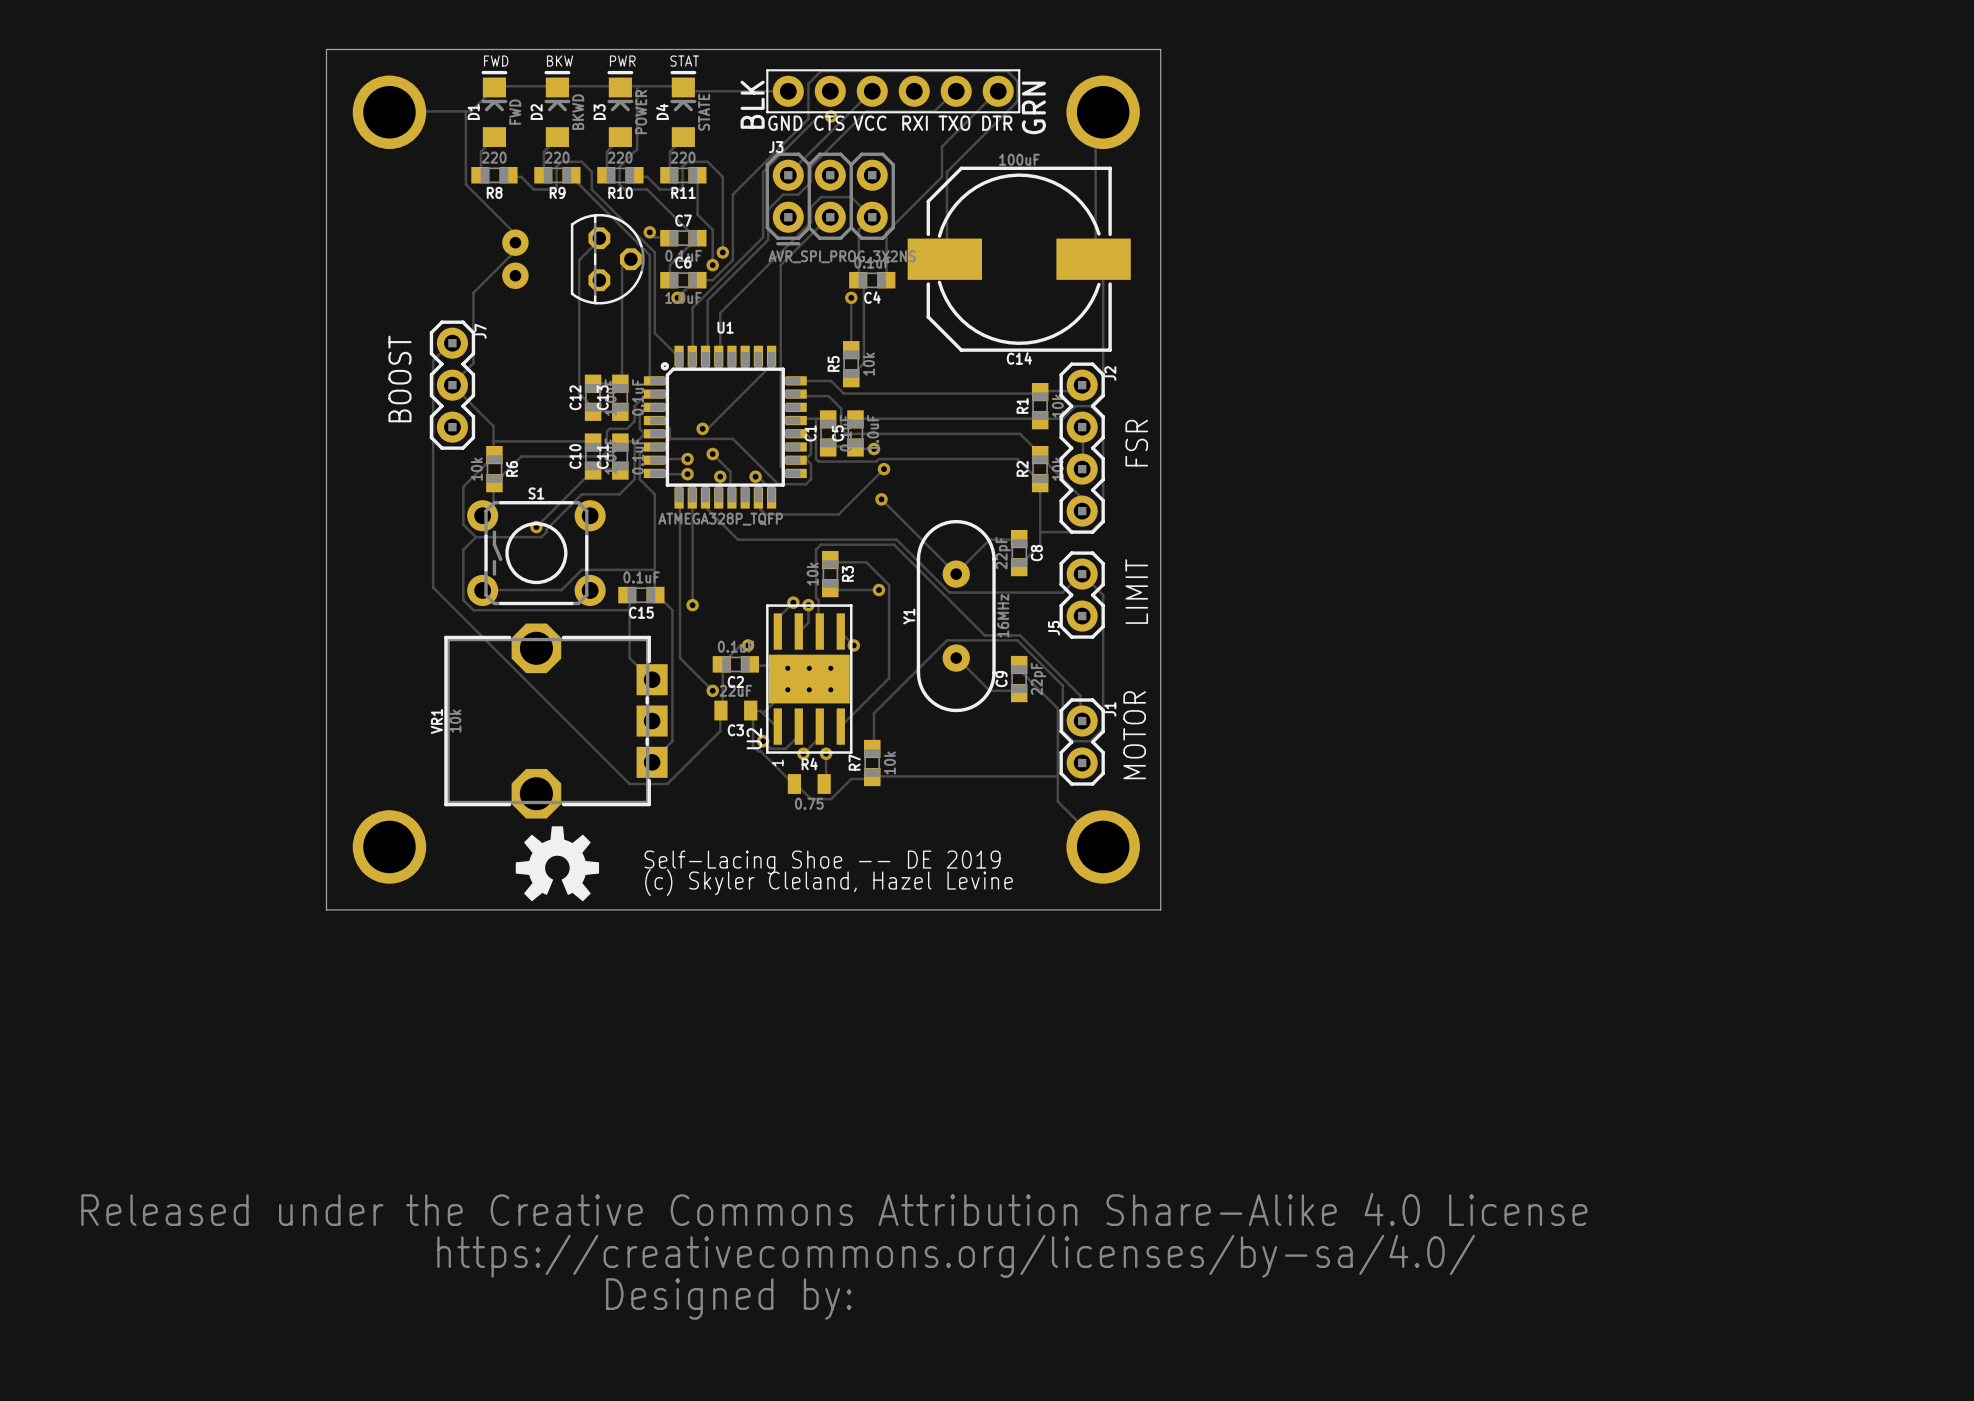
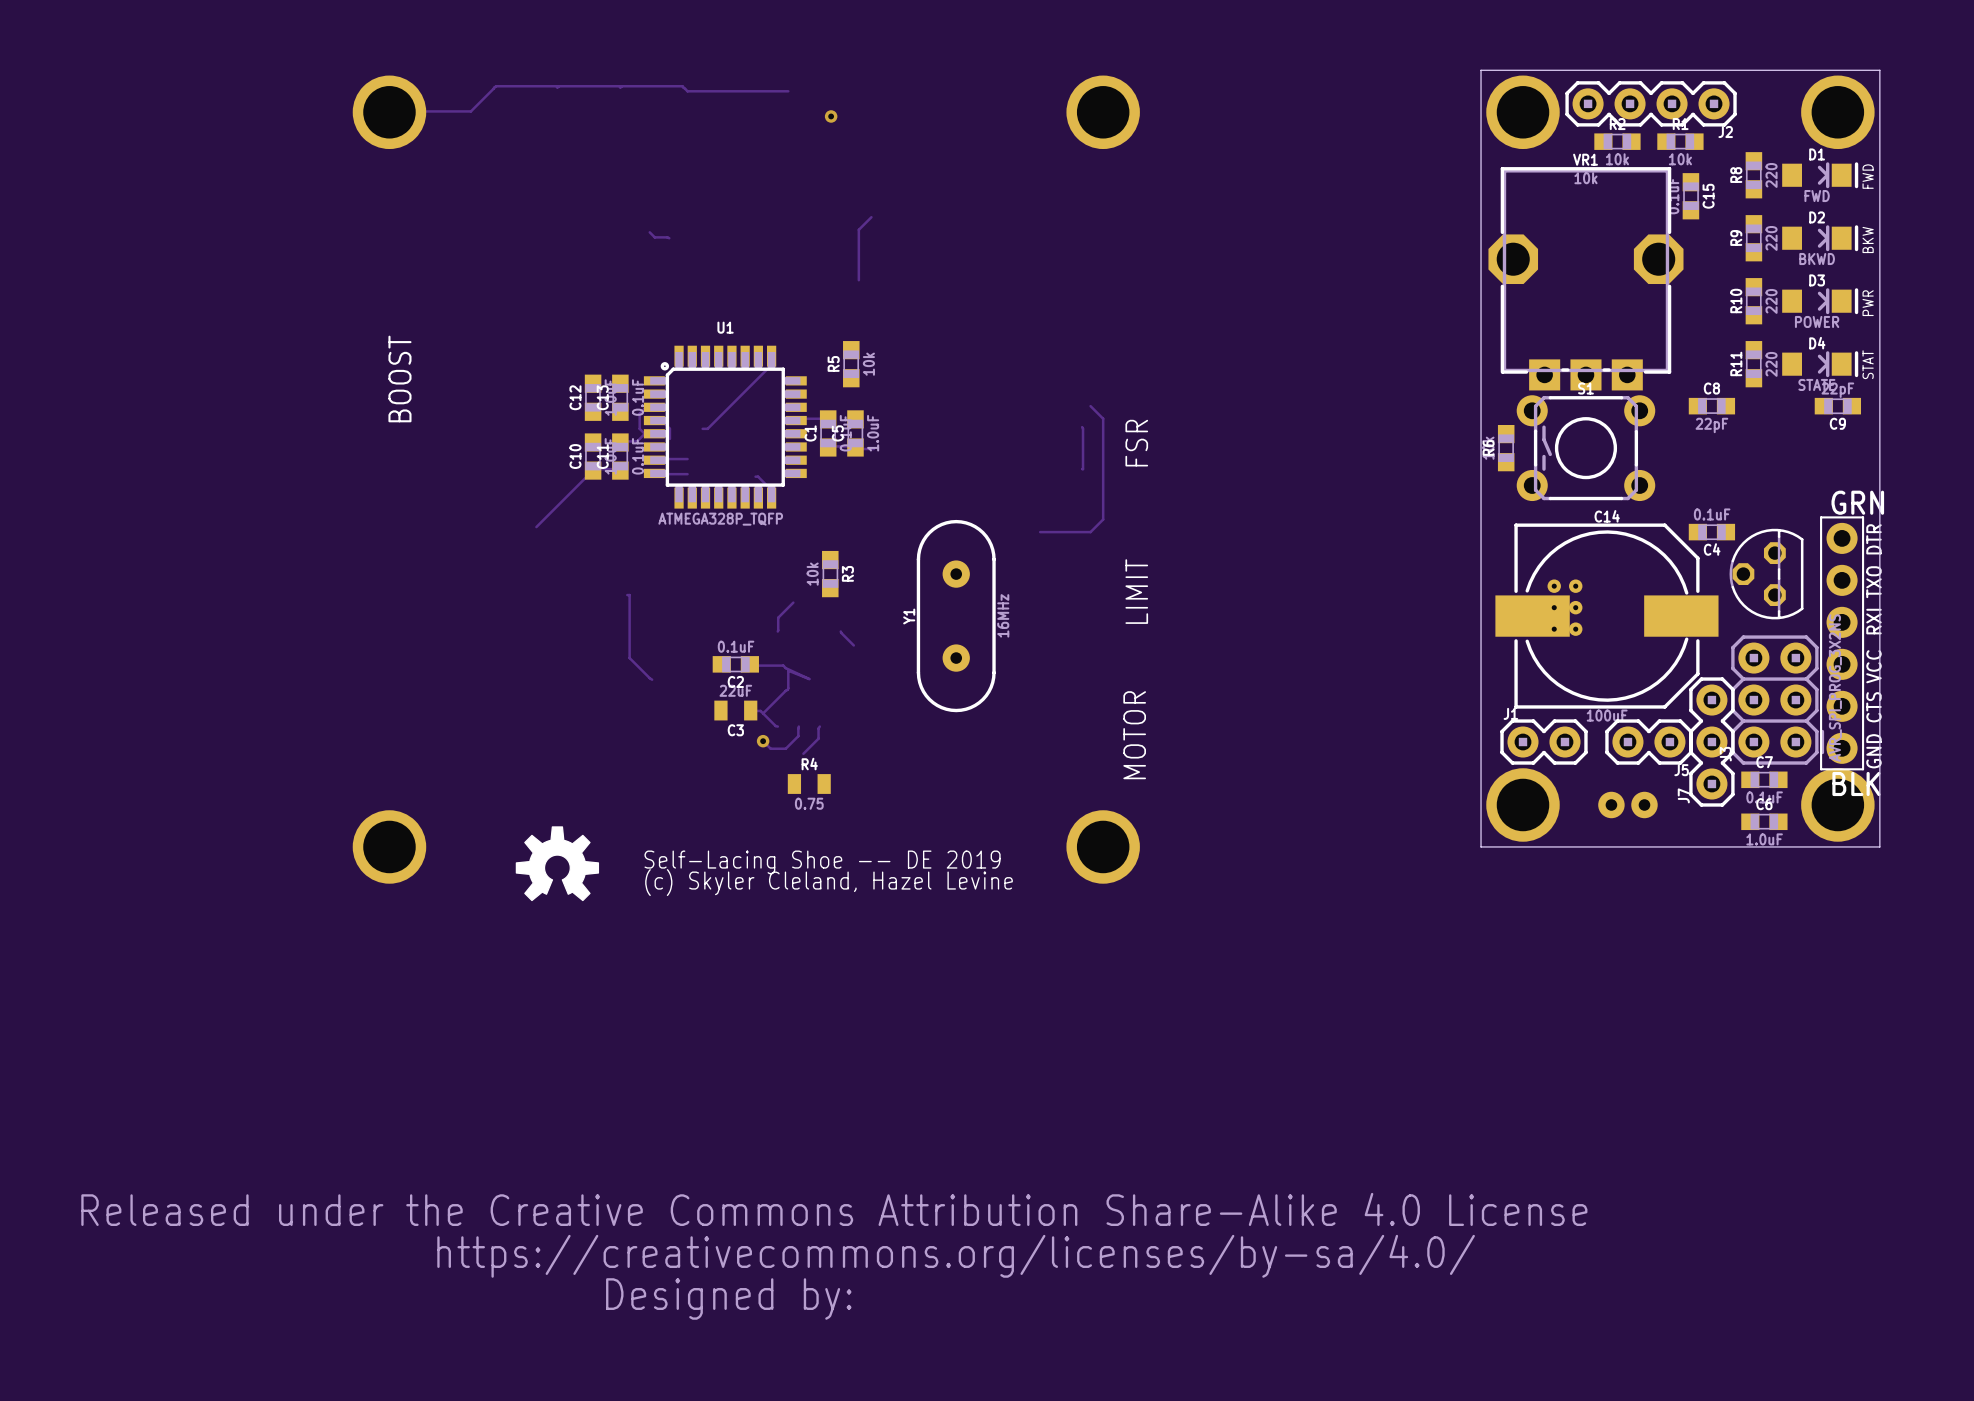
board edge: (326, 49) (1160, 49) (1160, 909) (326, 909) (326, 49) -> none
text: FWD (496, 61) -> none
text: BKW (560, 61) -> none
text: PWR (622, 61) -> none
text: STAT (684, 61) -> none
board edge: none -> (1481, 70) (1879, 70) (1879, 846) (1481, 846) (1481, 70)
track: (637, 86) (637, 149) (619, 166) (619, 184) (624, 189) (647, 189) (697, 238) (669, 265) (669, 280) -> none
track: (872, 91) (788, 175) -> none
part: (893, 91) -> none
track: (956, 91) (934, 111) (866, 111) (810, 166) (810, 181) (798, 194) (783, 194) (768, 209) (768, 239) (707, 300) (707, 355) (705, 356) -> none
track: (998, 91) (941, 146) (941, 176) (886, 232) (886, 280) -> none
D1 rotation: 0° (494, 108) -> 90° clockwise (1820, 175)
D1 position: (494, 108) -> (1820, 175)
D2 rotation: 0° (557, 108) -> 90° clockwise (1820, 238)
D2 position: (557, 108) -> (1820, 238)
D3 rotation: 0° (620, 108) -> 90° clockwise (1820, 301)
D3 position: (620, 108) -> (1820, 301)
D4 rotation: 0° (683, 108) -> 90° clockwise (1820, 364)
D4 position: (683, 108) -> (1820, 364)
track: (465, 111) (465, 184) (513, 232) (513, 242) (515, 242) (513, 252) (473, 292) (473, 363) (452, 385) (493, 426) (494, 455) (463, 486) (463, 524) (475, 537) -> none
track: (1103, 112) (1095, 121) (1095, 257) (1093, 259) (1103, 267) (1103, 393) (1090, 406) (1075, 406) (1062, 418) (855, 419) -> none
part: none -> (1523, 112)
part: none -> (1837, 112)
track: (831, 116) (818, 116) (763, 171) (763, 237) (692, 307) (692, 356) -> none
track: (494, 137) (480, 151) (480, 175) -> none
track: (557, 137) (543, 151) (543, 175) -> none
track: (620, 137) (606, 151) (606, 175) -> none
track: (683, 137) (669, 151) (669, 175) -> none
R8 rotation: 0° (494, 175) -> 90° clockwise (1753, 175)
R8 position: (494, 175) -> (1753, 175)
track: (508, 175) (508, 176) (521, 176) (533, 189) (554, 189) (556, 187) (556, 166) (561, 161) (581, 161) (591, 171) (591, 189) (654, 252) (654, 333) (679, 356) -> none
R9 rotation: 0° (557, 175) -> 90° clockwise (1753, 238)
R9 position: (557, 175) -> (1753, 238)
track: (571, 175) (649, 255) (649, 375) (654, 380) -> none
R10 rotation: 0° (620, 175) -> 90° clockwise (1753, 301)
R10 position: (620, 175) -> (1753, 301)
track: (634, 175) (634, 176) (647, 176) (659, 189) (679, 189) (682, 187) (682, 166) (687, 161) (707, 161) (722, 176) (722, 252) -> none
R11 rotation: 0° (683, 175) -> 90° clockwise (1753, 364)
R11 position: (683, 175) -> (1753, 364)
track: (697, 175) (697, 214) (712, 229) (712, 265) -> none
text: none -> FWD (1868, 176)
J3 rotation: 0° (830, 199) -> 90° counterclockwise (1777, 700)
J3 position: (830, 199) -> (1777, 700)
track: (830, 217) (780, 265) (780, 466) (785, 471) (795, 471) (796, 473) -> none
track: (872, 217) (851, 197) (821, 197) (810, 207) (810, 222) (720, 312) (720, 355) (718, 356) -> none
via: (649, 232) -> none
track: (599, 238) (579, 260) (579, 393) (591, 406) (593, 411) (620, 411) -> none
C7 position: (683, 238) -> (1764, 779)
text: none -> BKW (1868, 239)
via: (722, 252) -> none
part: (515, 259) -> none
part: (607, 259) -> none
track: (630, 259) (622, 267) (622, 383) (593, 383) -> none
track: (944, 259) (947, 257) (947, 171) (1017, 101) (1017, 81) (1007, 71) (821, 71) (808, 83) (808, 119) (732, 194) (732, 260) (712, 280) (695, 280) (677, 297) -> none
C14 rotation: 0° (1019, 259) -> 180° (1606, 616)
C14 position: (1019, 259) -> (1606, 616)
via: (712, 265) -> none
C6 position: (683, 280) -> (1764, 821)
track: (858, 280) (863, 285) (863, 363) (851, 378) -> none
C4 position: (872, 280) -> (1711, 532)
via: (677, 297) -> none
track: (851, 297) (851, 350) -> none
via: (851, 297) -> none
text: none -> PWR (1868, 303)
J7 name position: J7 (480, 331) -> J7 (1683, 795)
track: (452, 343) (433, 360) (433, 587) (629, 784) (667, 784) (720, 731) (720, 710) (722, 708) (721, 664) (740, 645) (748, 645) -> none
text: none -> STAT (1868, 364)
track: (796, 380) (831, 380) (843, 393) (1040, 393) (1040, 391) (1075, 391) (1082, 385) -> none
J7 position: (452, 385) -> (1711, 742)
track: (654, 394) (652, 396) (644, 396) (634, 406) (634, 421) (627, 428) (609, 428) (606, 431) (606, 451) (601, 456) (521, 456) (493, 484) (493, 504) (482, 515) -> none
track: (796, 394) (798, 396) (828, 396) (841, 408) (841, 428) (846, 433) (1020, 433) (1080, 496) (1082, 511) -> none
R1 rotation: 0° (1040, 406) -> 90° clockwise (1680, 141)
R1 position: (1040, 406) -> (1680, 141)
track: (816, 418) (816, 459) (818, 461) (876, 461) (878, 459) (1017, 459) (1040, 481) (1040, 544) (1019, 567) -> none
via: (702, 428) -> none
track: (796, 433) (805, 433) (810, 438) (810, 454) (805, 459) -> none
track: (493, 441) (593, 442) -> none
track: (634, 441) (634, 479) (619, 494) (581, 494) (546, 529) (541, 537) (475, 537) -> none
via: (873, 448) -> none
J2 rotation: 0° (1082, 448) -> 90° clockwise (1651, 103)
J2 position: (1082, 448) -> (1651, 103)
track: (712, 454) (730, 471) (731, 498) -> none
via: (712, 454) -> none
via: (687, 459) -> none
track: (805, 459) (810, 464) (810, 479) (805, 484) (778, 484) (732, 438) (669, 438) (662, 446) (644, 448) (639, 454) (639, 479) (654, 494) (654, 595) (657, 595) (672, 610) (672, 741) (652, 762) -> none
R6 name position: R6 (512, 468) -> R6 (1488, 447)
R6 position: (494, 469) -> (1506, 448)
track: (884, 469) (838, 514) (765, 514) (760, 509) (760, 499) (758, 498) -> none
via: (884, 469) -> none
R2 rotation: 0° (1040, 469) -> 90° clockwise (1617, 141)
R2 position: (1040, 469) -> (1617, 141)
via: (687, 474) -> none
via: (720, 476) -> none
via: (755, 476) -> none
track: (679, 498) (679, 658) (712, 690) -> none
track: (692, 498) (692, 605) -> none
track: (705, 498) (707, 499) (707, 509) (737, 539) (896, 539) (949, 592) (1062, 592) (1082, 574) (1103, 595) (1103, 728) (1090, 741) (1072, 741) (1062, 731) (1062, 685) (1017, 640) (947, 640) (873, 713) (873, 748) (872, 748) -> none
track: (881, 499) (956, 574) (989, 539) (1019, 539) -> none
via: (881, 499) -> none
via: (536, 527) -> none
track: (475, 537) (463, 549) (463, 600) (473, 610) (629, 610) -> none
S1 position: (536, 553) -> (1585, 448)
C8 rotation: 0° (1019, 553) -> 90° clockwise (1711, 406)
C8 position: (1019, 553) -> (1711, 406)
track: (830, 560) (831, 562) (866, 562) (889, 585) (889, 678) (840, 726) -> none
track: (654, 569) (581, 569) (561, 590) (482, 590) -> none
part: none -> (1766, 574)
track: (830, 588) (831, 590) (878, 590) -> none
via: (878, 590) -> none
C15 rotation: 0° (641, 595) -> 90° clockwise (1690, 196)
C15 position: (641, 595) -> (1690, 196)
J5 rotation: 0° (1082, 595) -> 90° clockwise (1648, 742)
J5 position: (1082, 595) -> (1648, 742)
via: (793, 602) -> none
via: (692, 605) -> none
track: (808, 605) (808, 622) (798, 631) -> none
via: (808, 605) -> none
part: none -> (1564, 607)
J5 name position: J5 (1054, 628) -> J5 (1681, 770)
track: (819, 631) (818, 600) (816, 597) (816, 549) (821, 544) (894, 544) (984, 635) (1020, 635) (1080, 695) (1080, 721) (1082, 721) -> none
part: none -> (1842, 643)
via: (748, 645) -> none
via: (853, 645) -> none
track: (956, 658) (989, 690) (1017, 690) (1019, 693) -> none
track: (1019, 664) (1020, 670) (1057, 708) (1057, 801) (1103, 846) -> none
U2: (809, 679) -> none
C9 rotation: 0° (1019, 679) -> 90° clockwise (1837, 406)
C9 position: (1019, 679) -> (1837, 406)
via: (712, 690) -> none
J1 name position: J1 (1110, 709) -> J1 (1510, 713)
track: (750, 710) (753, 710) (753, 746) (810, 799) (831, 799) (851, 778) (871, 778) (873, 776) (1057, 776) -> none
VR1 rotation: 0° (555, 721) -> 90° clockwise (1585, 278)
VR1 position: (555, 721) -> (1585, 278)
J1 rotation: 0° (1082, 742) -> 90° clockwise (1543, 742)
J1 position: (1082, 742) -> (1543, 742)
via: (803, 753) -> none
track: (826, 753) (826, 784) (824, 784) -> none
via: (826, 753) -> none
R7: 10k (872, 763) -> none
part: none -> (1523, 804)
part: none -> (1627, 804)
part: none -> (1837, 804)

